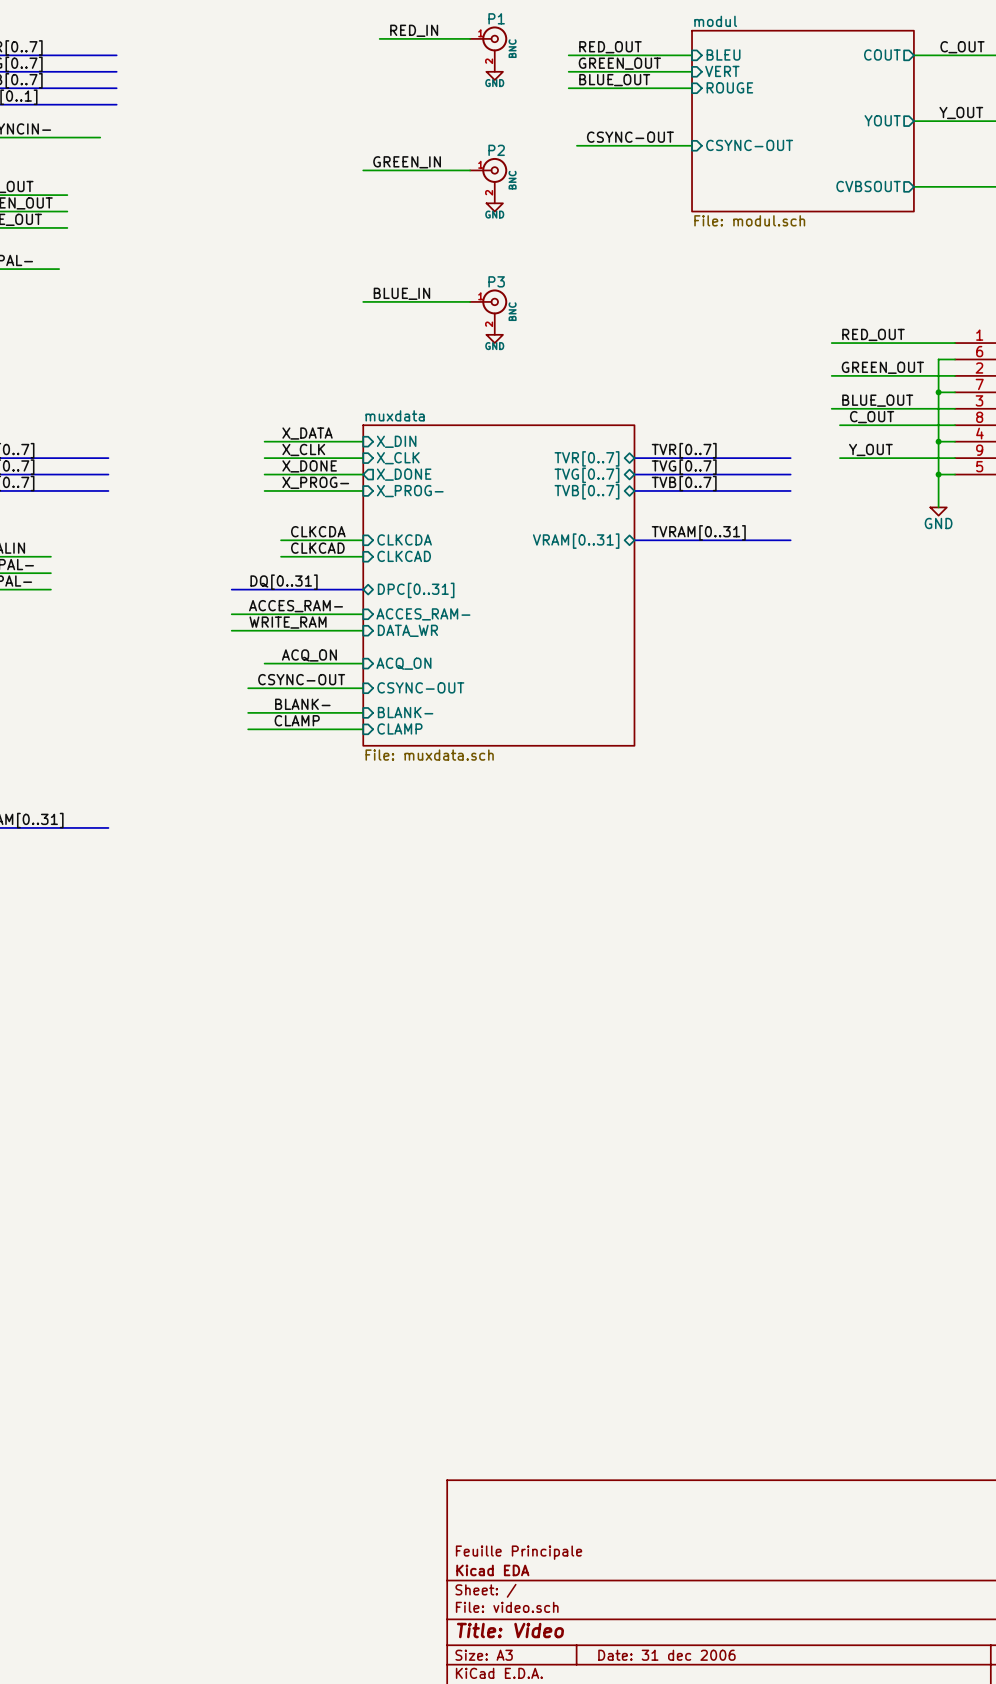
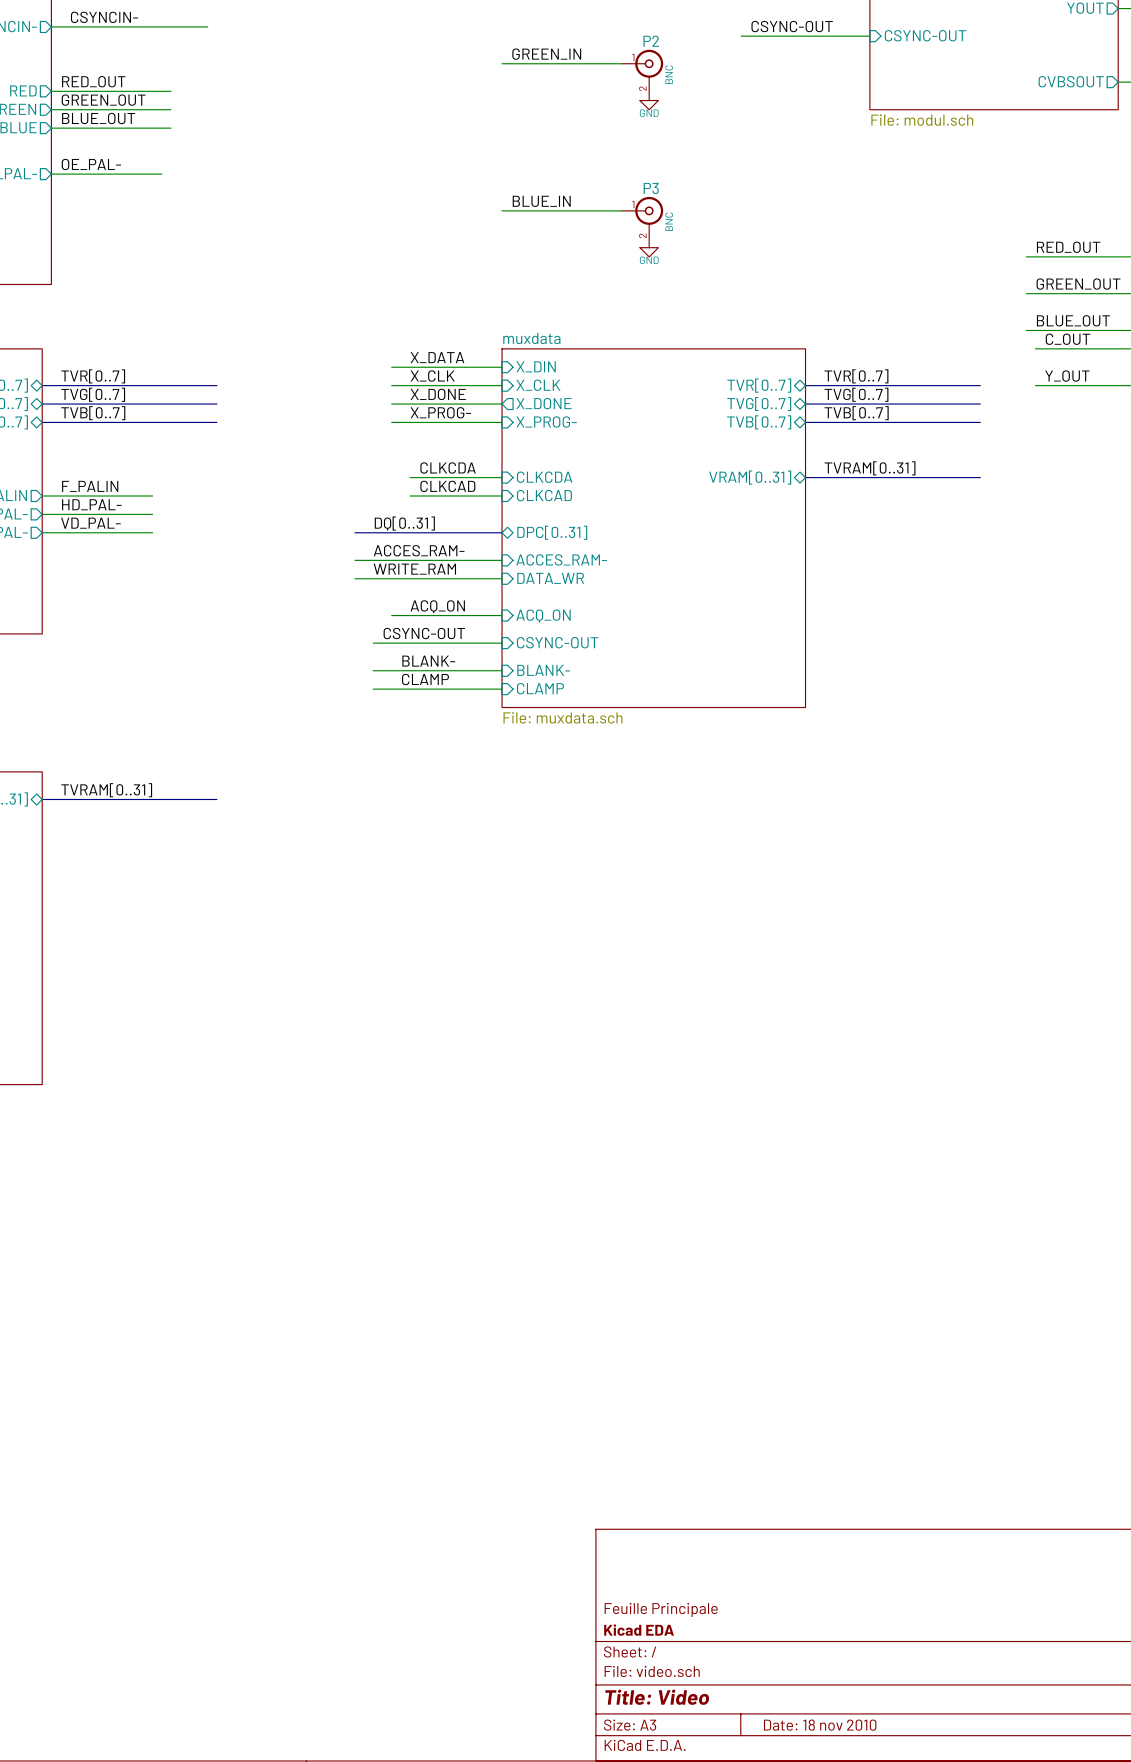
title block: Date: 31 dec 2006 (666, 1655) -> Date: 18 nov 2010 (820, 1725)

